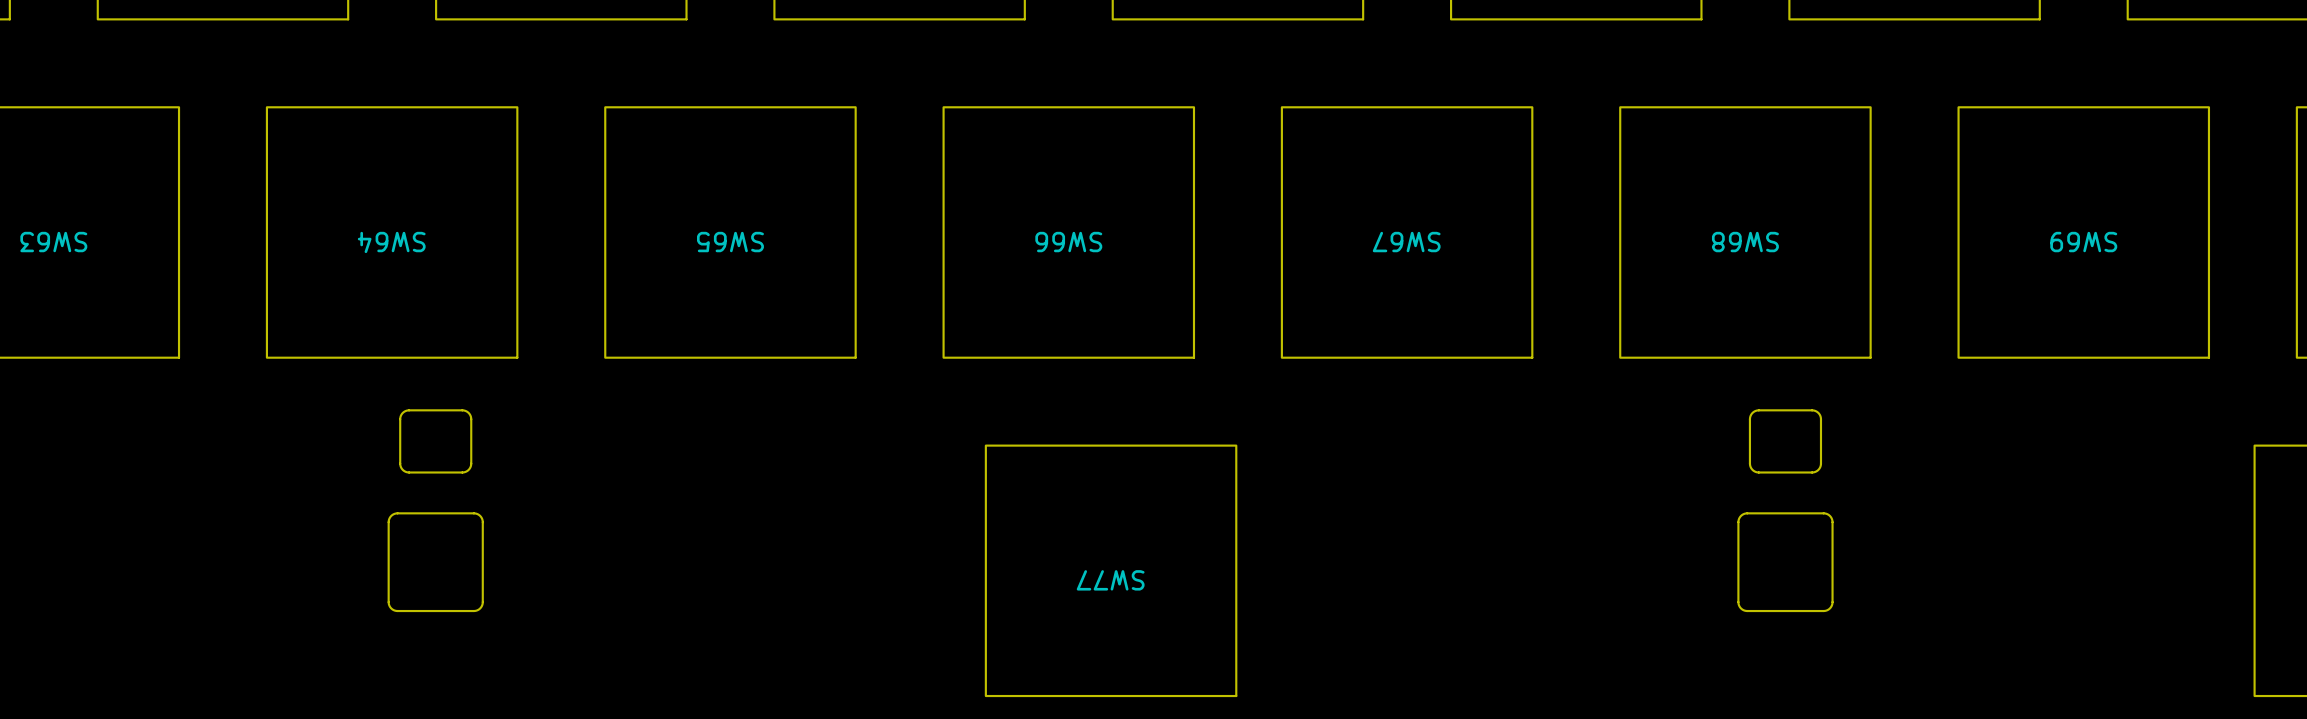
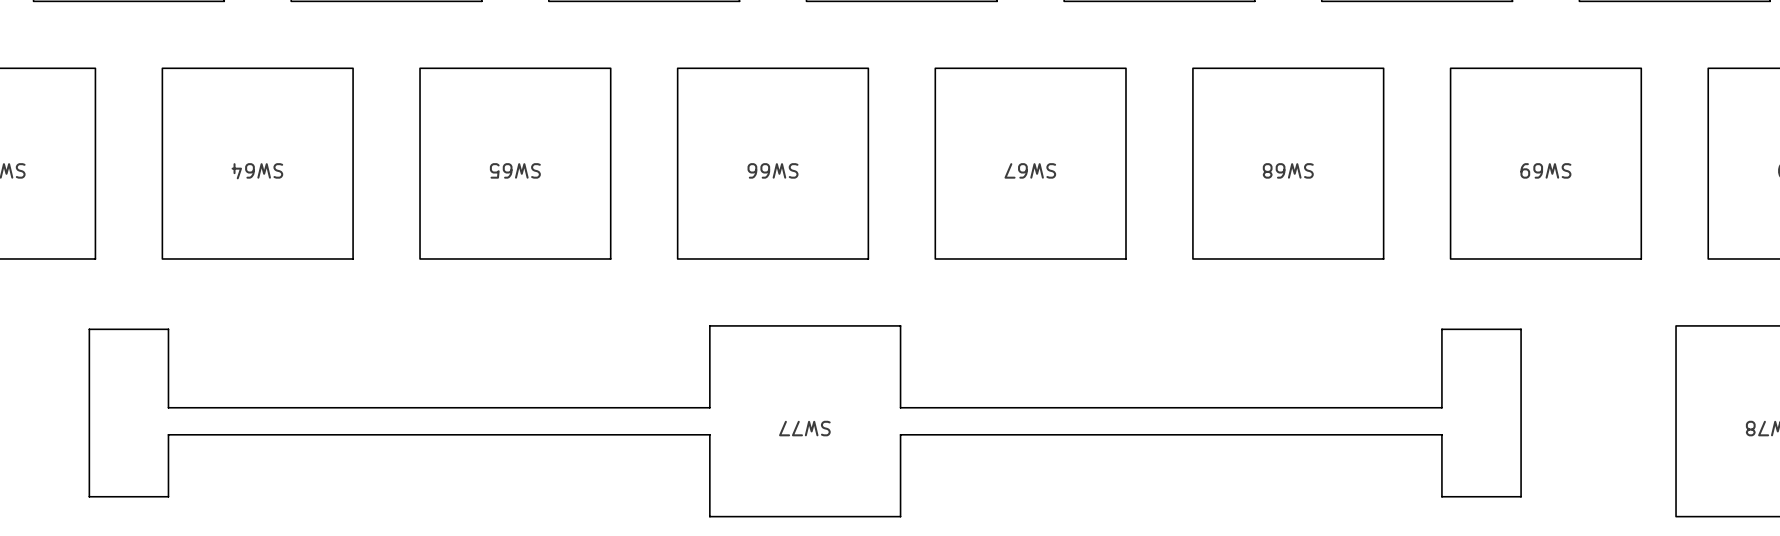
drawing: [387, 409, 1834, 613] -> none
SW77 footprint: [984, 444, 1238, 698] -> [88, 325, 1522, 518]

